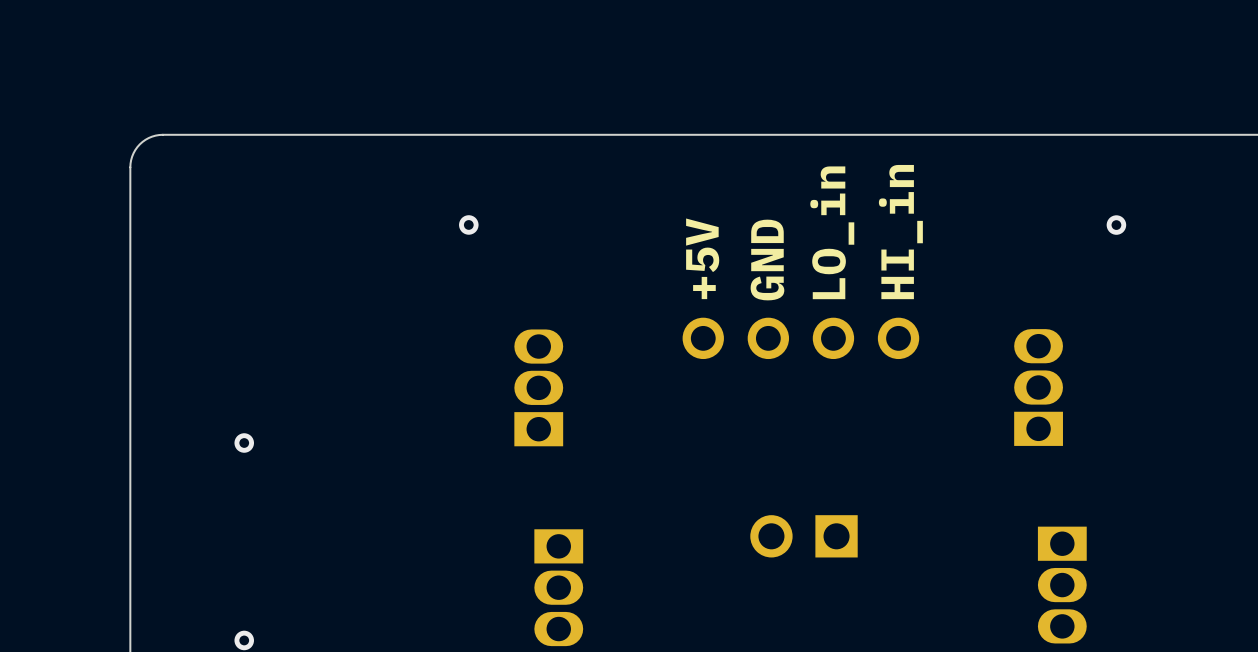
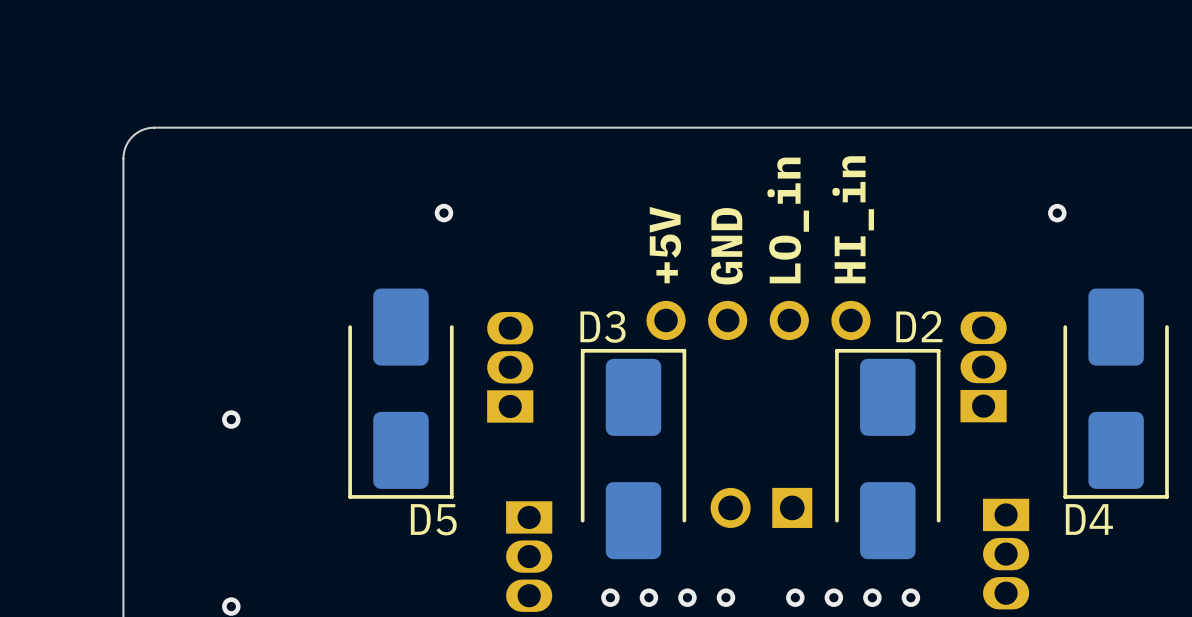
D5: none -> (400, 393)
D4: none -> (1116, 393)
D3: none -> (633, 454)
D2: none -> (887, 454)
via: none -> (610, 597)
via: none -> (648, 597)
via: none -> (687, 597)
via: none -> (725, 597)
via: none -> (795, 597)
via: none -> (833, 597)
via: none -> (872, 597)
via: none -> (910, 597)

